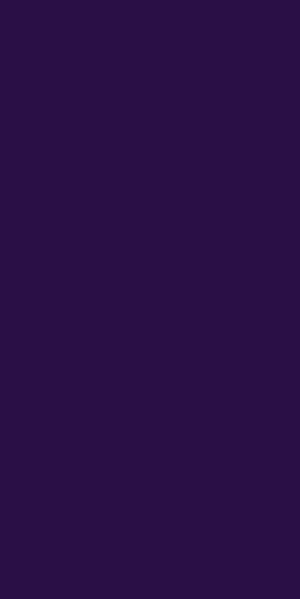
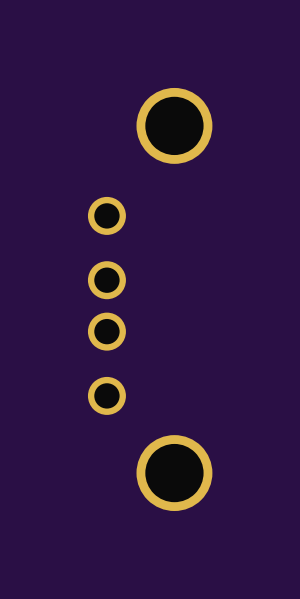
part: none -> (150, 299)

